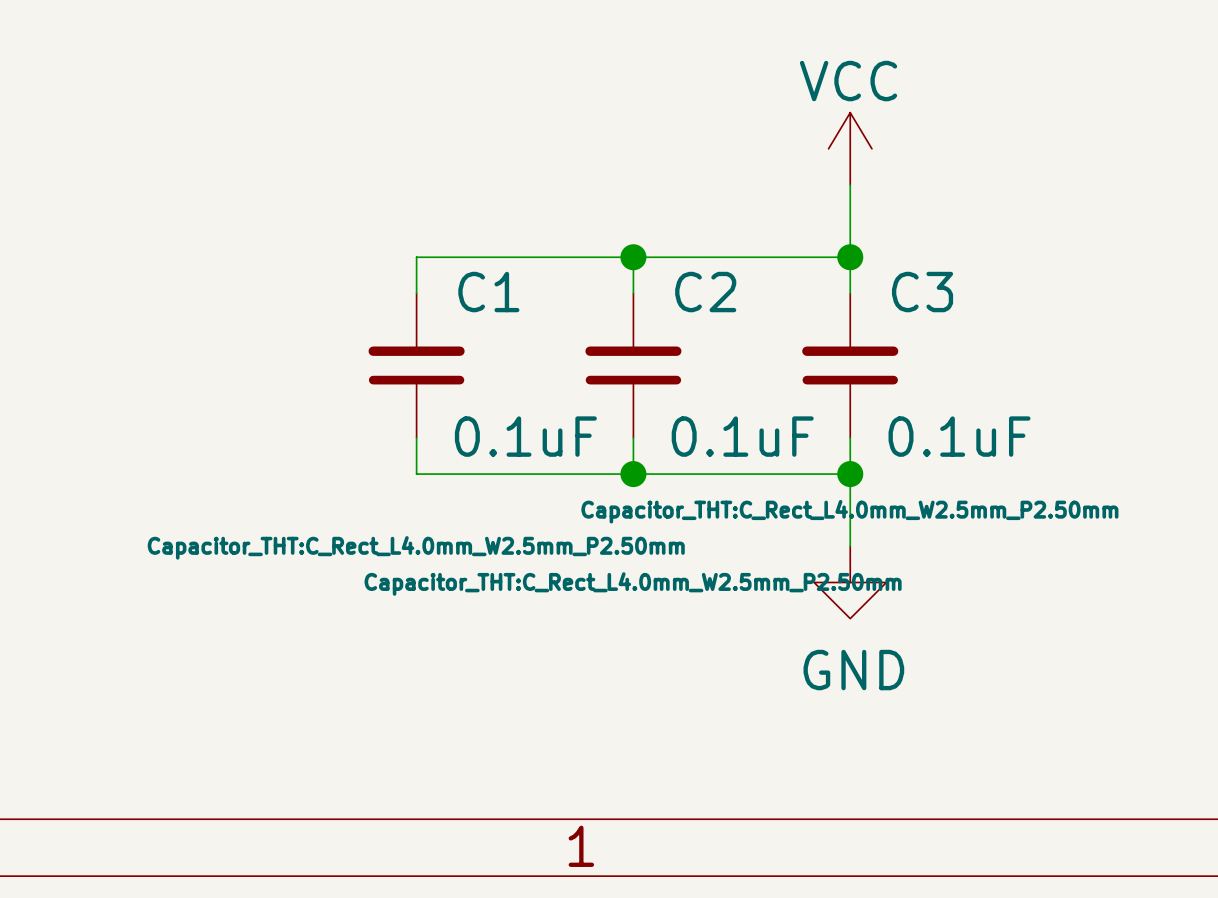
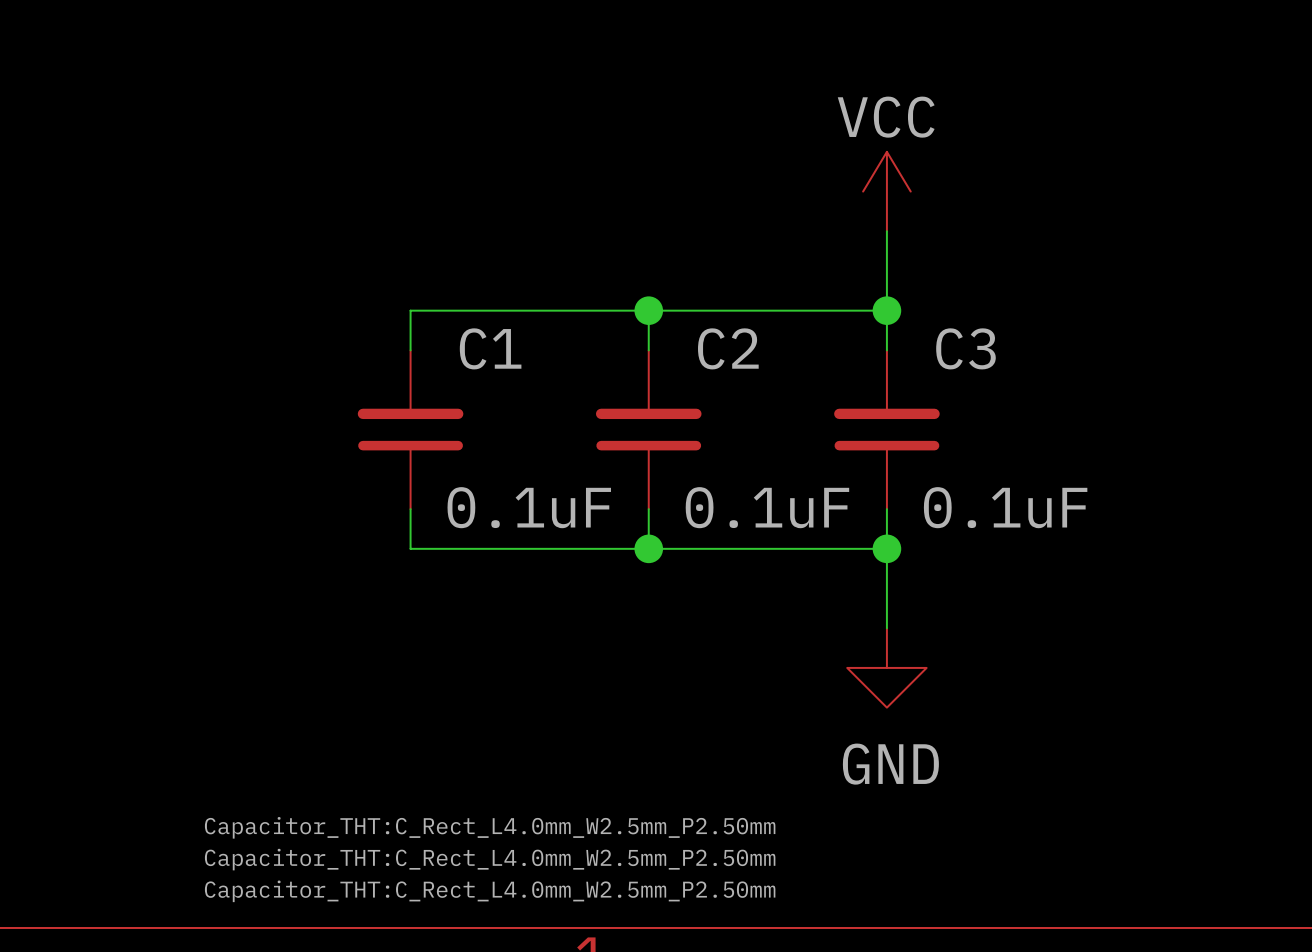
C3 text position: Capacitor_THT:C_Rect_L4.0mm_W2.5mm_P2.50mm (849, 511) -> Capacitor_THT:C_Rect_L4.0mm_W2.5mm_P2.50mm (490, 891)
C1 text position: Capacitor_THT:C_Rect_L4.0mm_W2.5mm_P2.50mm (416, 547) -> Capacitor_THT:C_Rect_L4.0mm_W2.5mm_P2.50mm (490, 859)
C2 text position: Capacitor_THT:C_Rect_L4.0mm_W2.5mm_P2.50mm (633, 584) -> Capacitor_THT:C_Rect_L4.0mm_W2.5mm_P2.50mm (490, 827)

